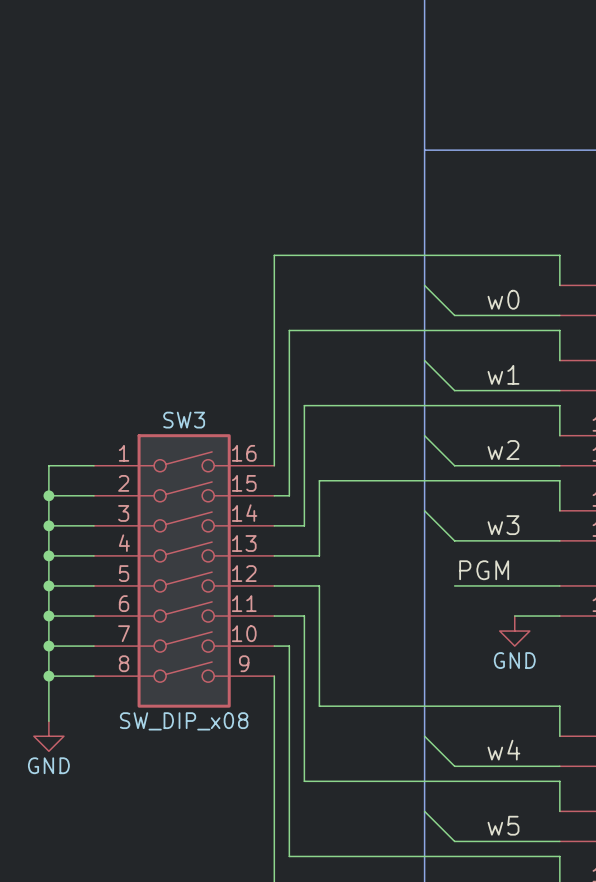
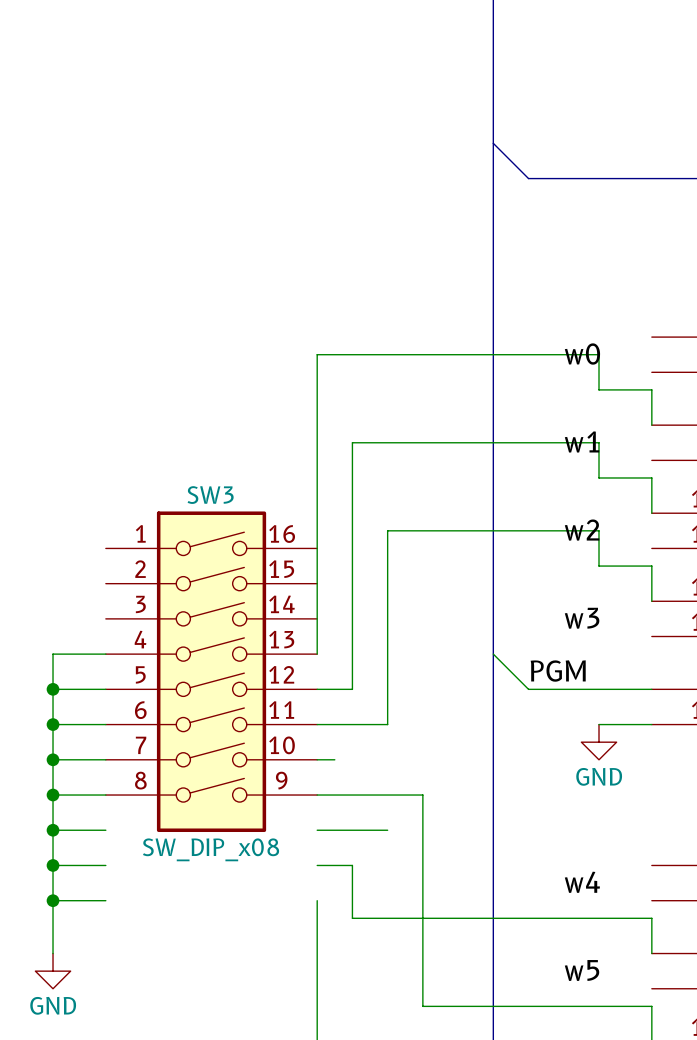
bus: (424, 150) (454, 150) -> (493, 143) (528, 178)
wire: (424, 285) (454, 315) (559, 315) -> none
wire: (559, 285) (559, 255) (274, 255) (274, 300) -> (599, 389) (599, 354) (317, 354)
wire: (514, 330) (289, 330) (289, 495) (274, 495) -> none
wire: (424, 360) (454, 390) (559, 390) -> none
wire: (304, 405) (514, 405) -> (352, 477) (352, 442) (599, 442) (599, 477)
wire: (424, 435) (454, 465) (559, 465) -> none
wire: (93, 465) (48, 465) (48, 555) -> none
wire: (514, 480) (319, 480) (319, 555) (274, 555) -> (599, 566) (599, 530) (387, 530) (387, 724) (352, 724)
wire: (48, 495) (93, 495) -> (53, 830) (105, 830)
junction: (48, 495) -> none
wire: (424, 510) (454, 540) (559, 540) -> none
wire: (48, 525) (93, 525) -> (53, 865) (105, 865)
junction: (48, 525) -> none
wire: (274, 525) (304, 525) -> (352, 689) (352, 618)
junction: (48, 555) -> none
wire: none -> (493, 654) (528, 689)
wire: (304, 585) (319, 585) (319, 706) -> (317, 830) (370, 830)
wire: (304, 616) (304, 736) -> (317, 865) (352, 865)
wire: (289, 646) (289, 856) (364, 856) -> (317, 795) (422, 795) (422, 1006)
wire: (274, 676) (274, 766) -> (317, 548) (317, 654)
junction: none -> (53, 830)
wire: (334, 706) (559, 706) (559, 736) -> none
wire: none -> (53, 847) (53, 953)
power symbol position: GND (48, 736) -> GND (53, 971)
junction: none -> (53, 865)
wire: (424, 736) (454, 766) (559, 766) -> none
wire: none -> (53, 900) (105, 900)
junction: none -> (53, 900)
wire: (424, 811) (454, 841) (559, 841) -> none

